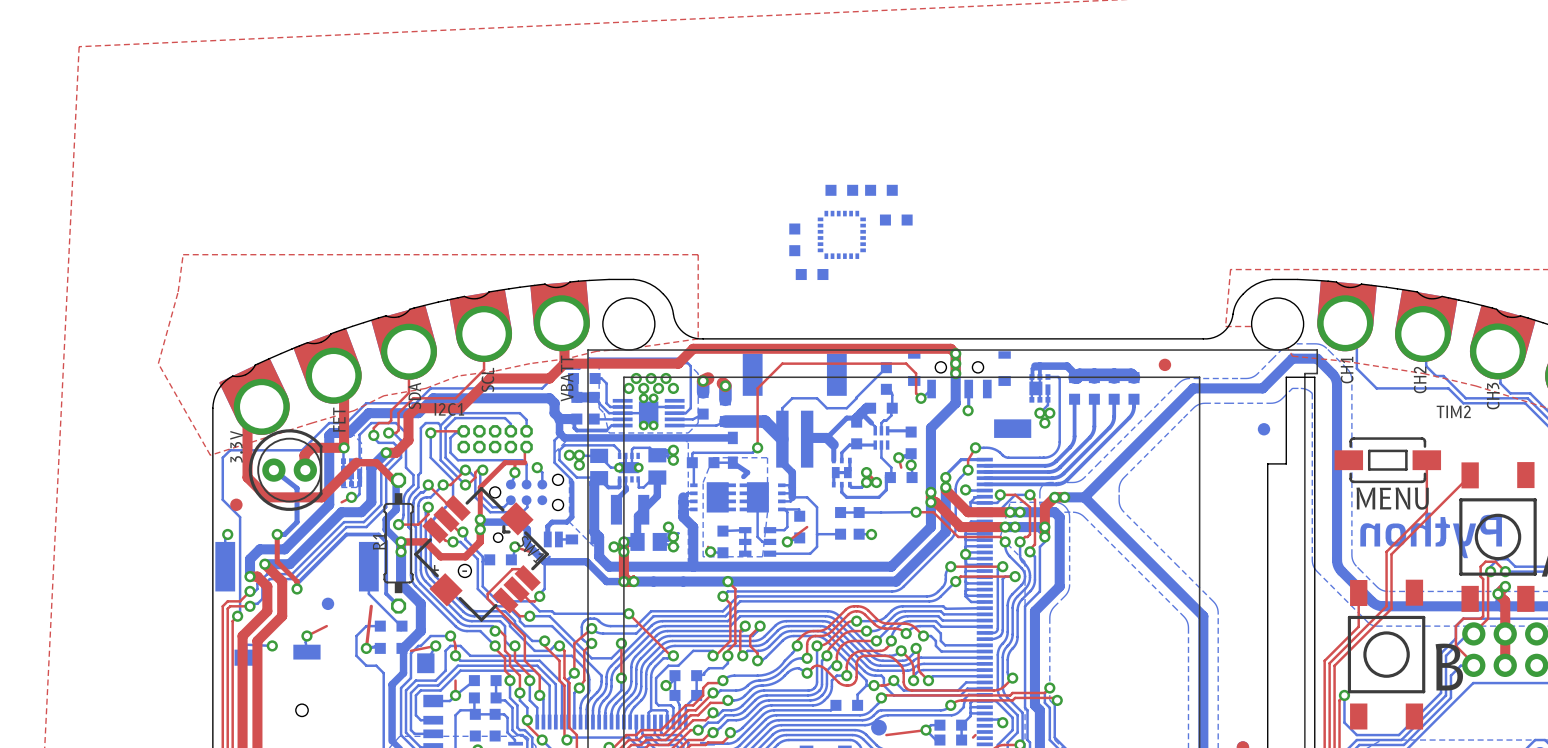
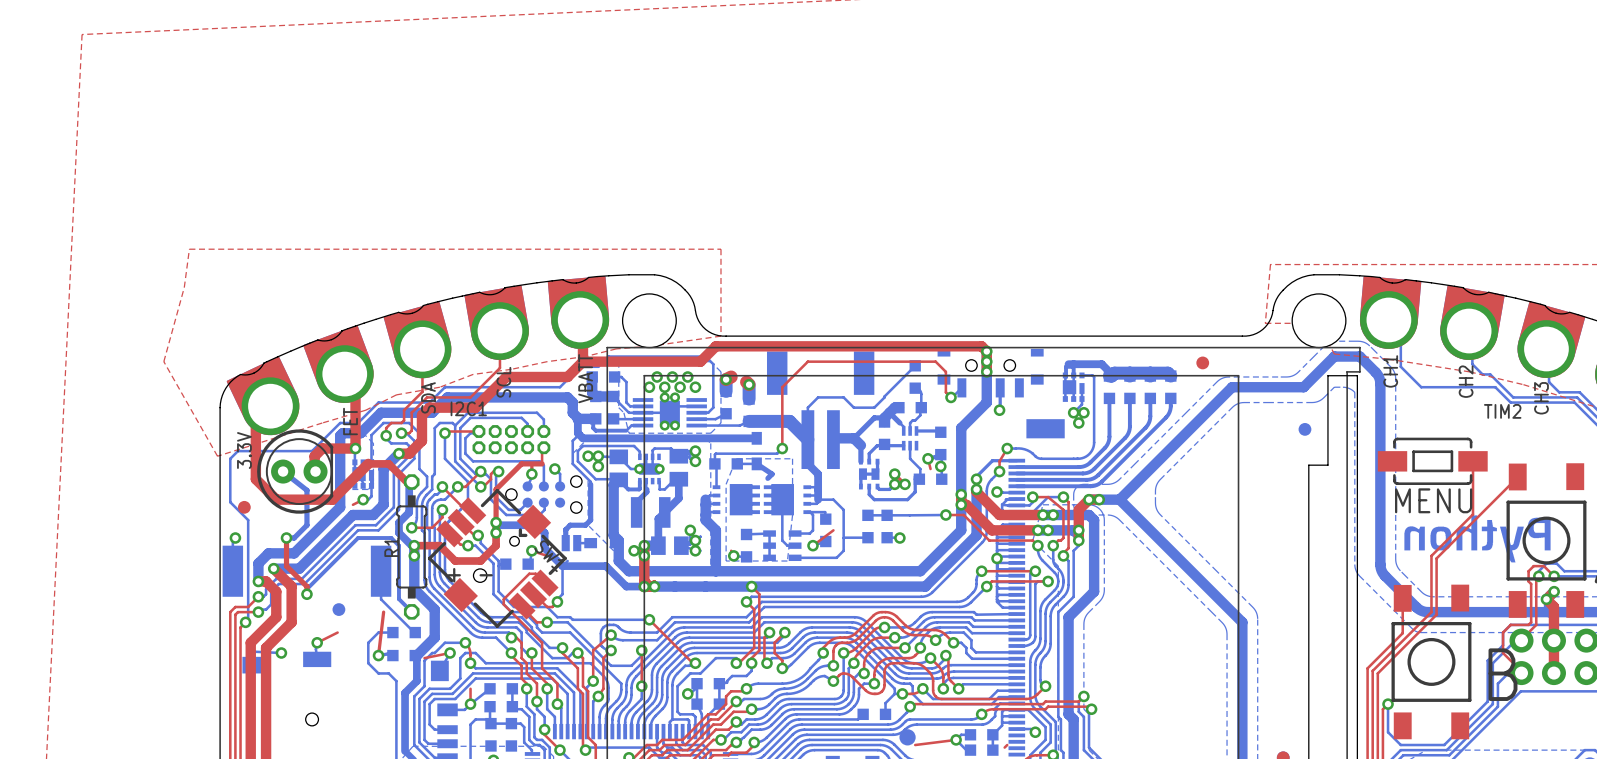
part: (841, 190) -> none
part: (881, 190) -> none
part: (896, 220) -> none
part: (841, 234) -> none
part: (794, 239) -> none
part: (812, 274) -> none

